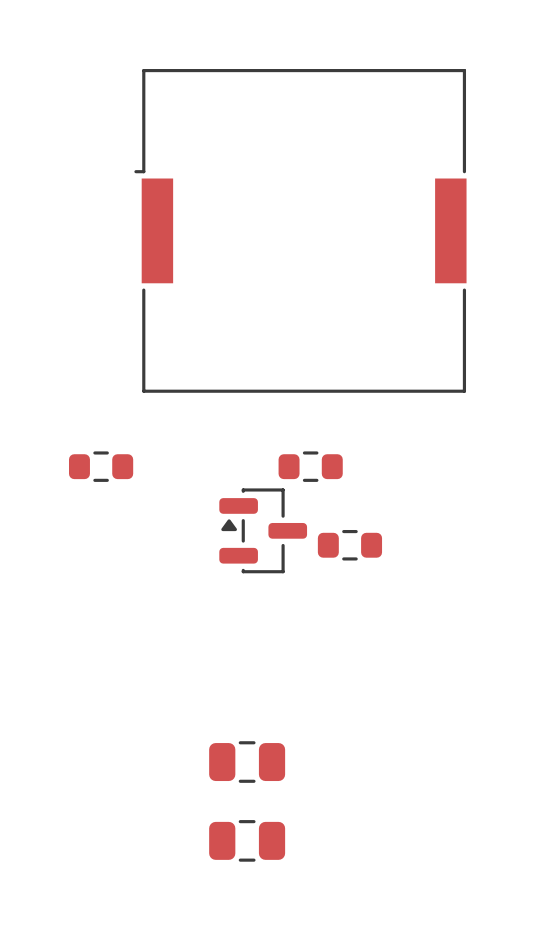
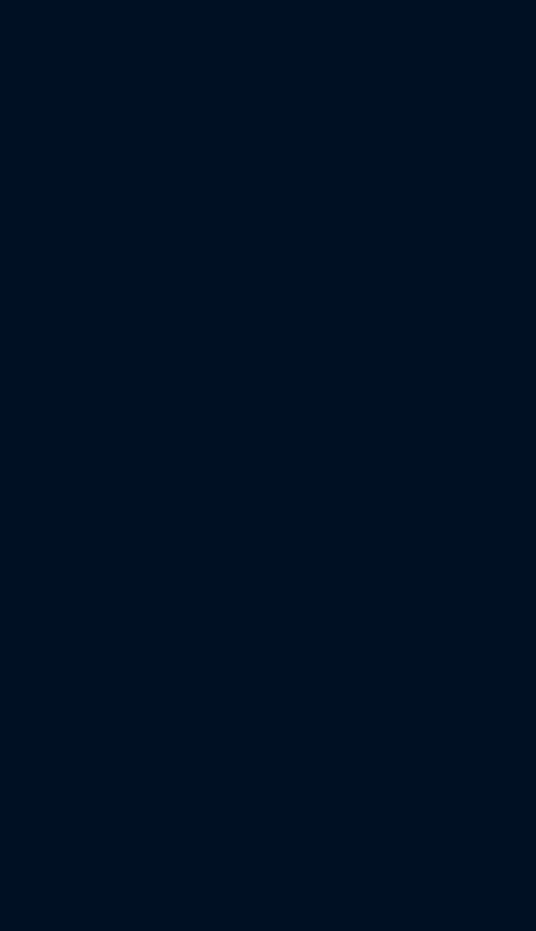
part: (300, 230) -> none
part: (101, 466) -> none
part: (310, 466) -> none
part: (263, 530) -> none
part: (349, 545) -> none
part: (247, 762) -> none
part: (247, 840) -> none

